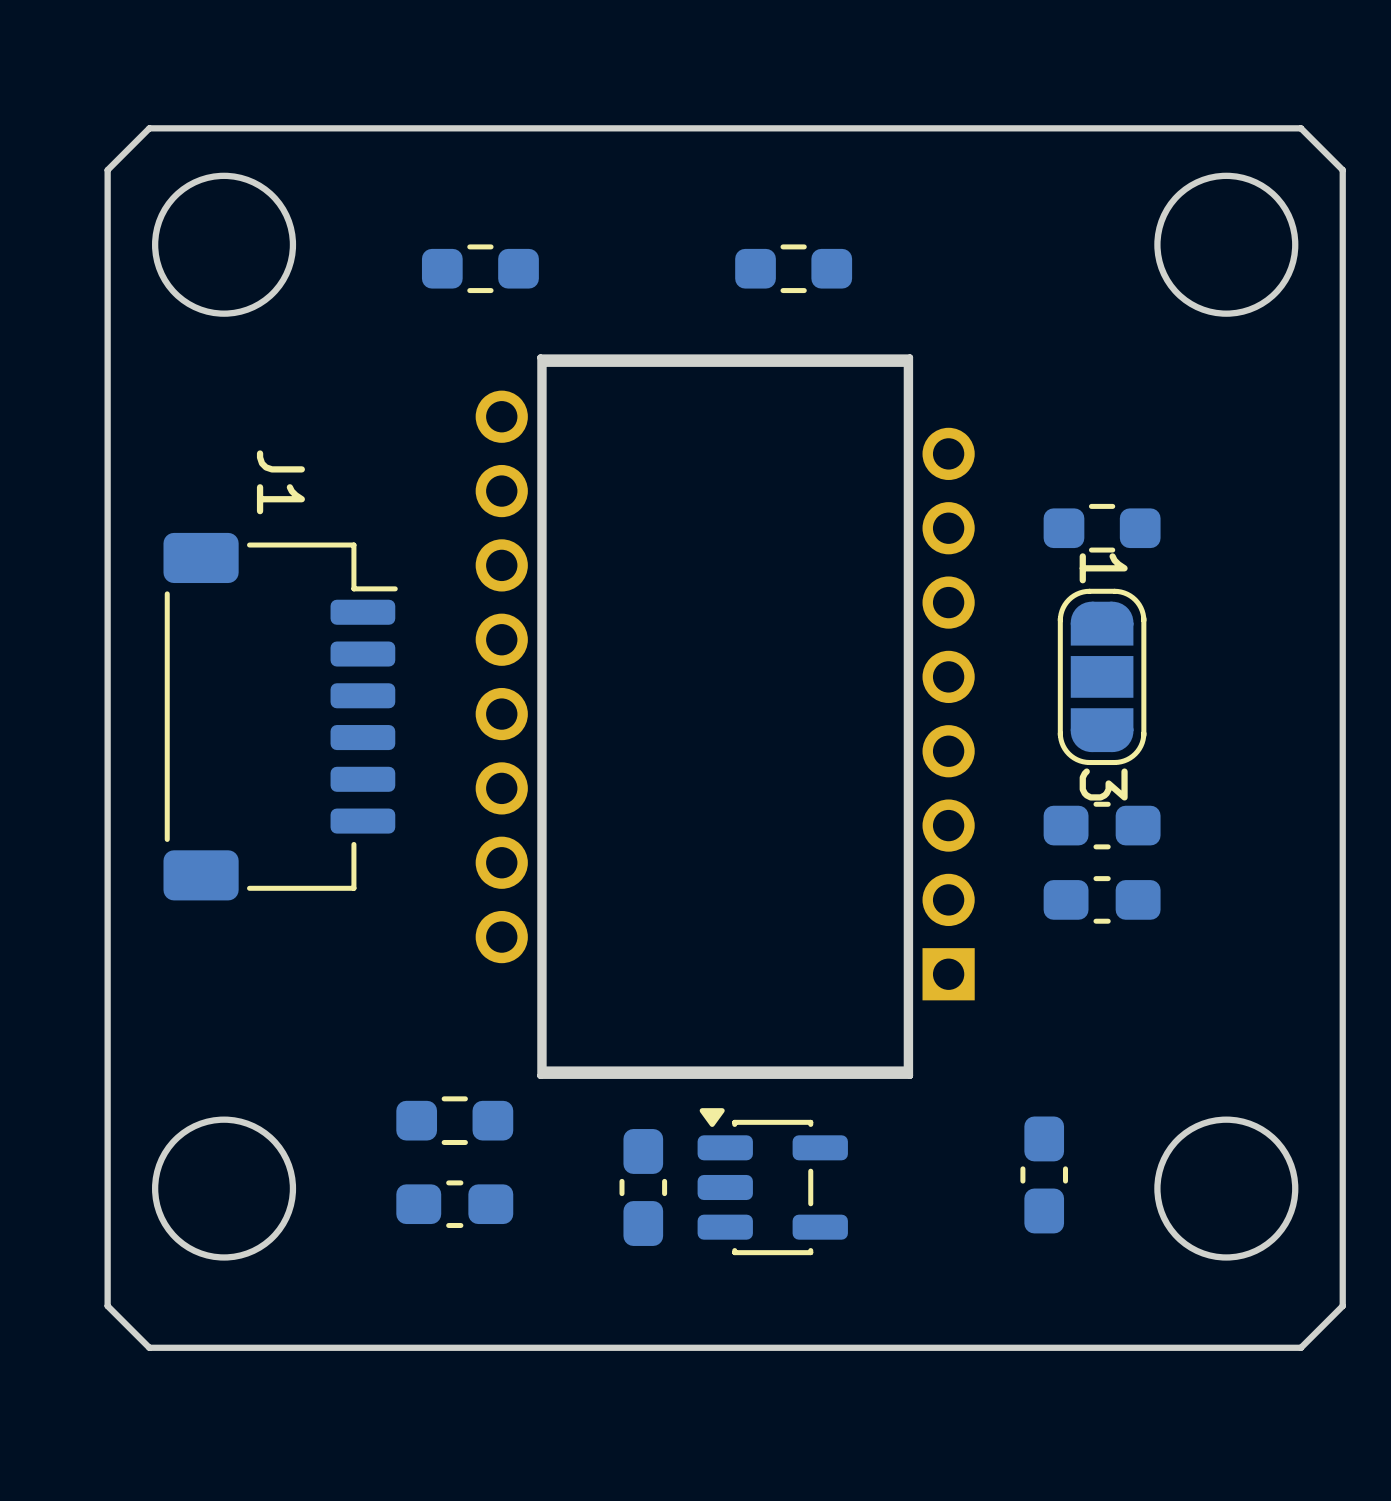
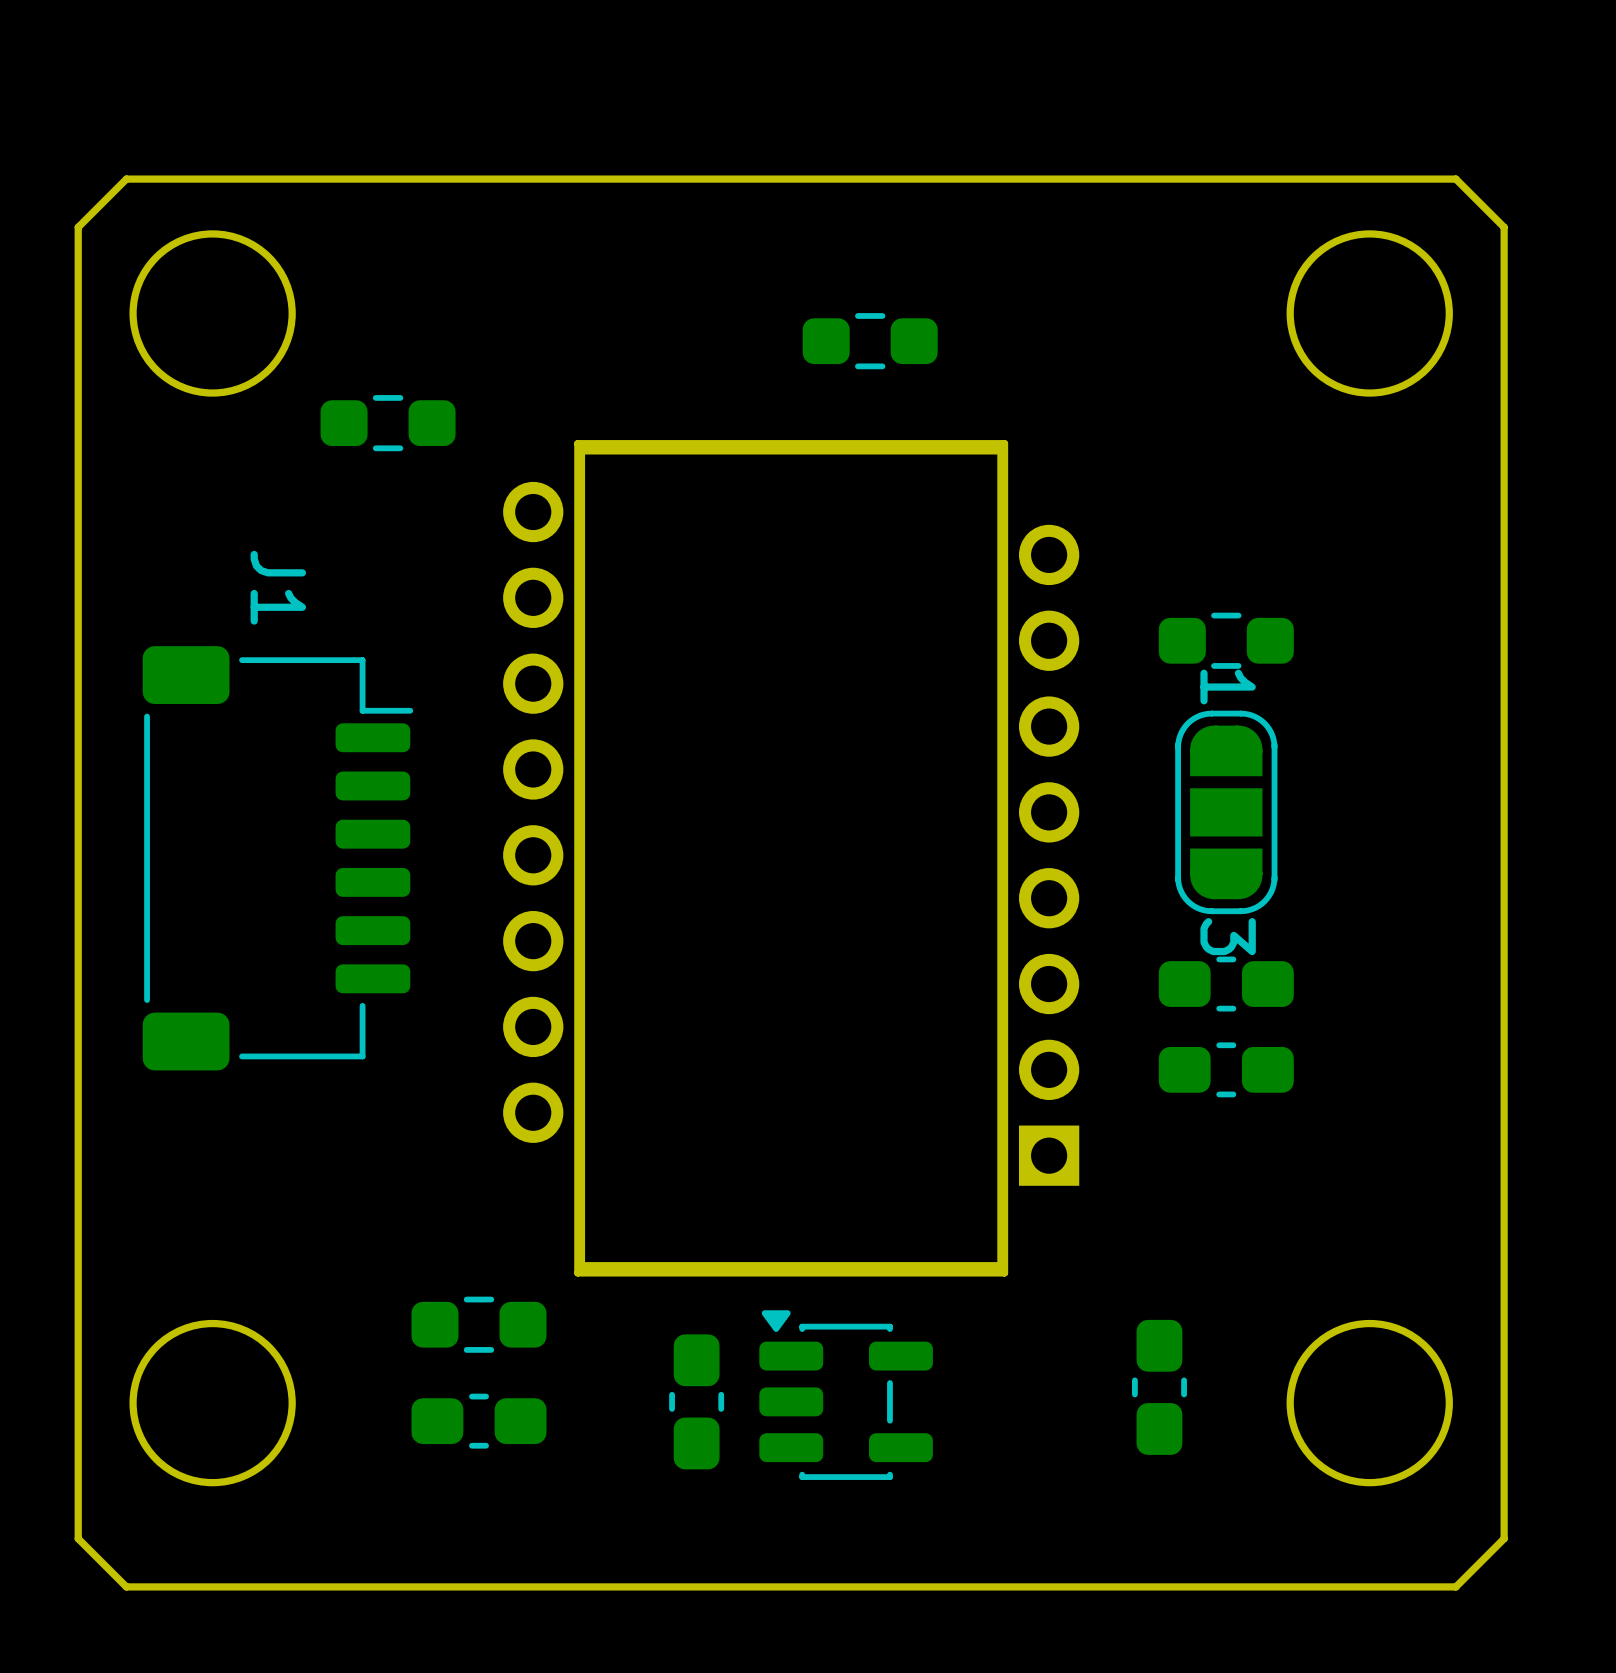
part position: (480, 268) -> (388, 423)

